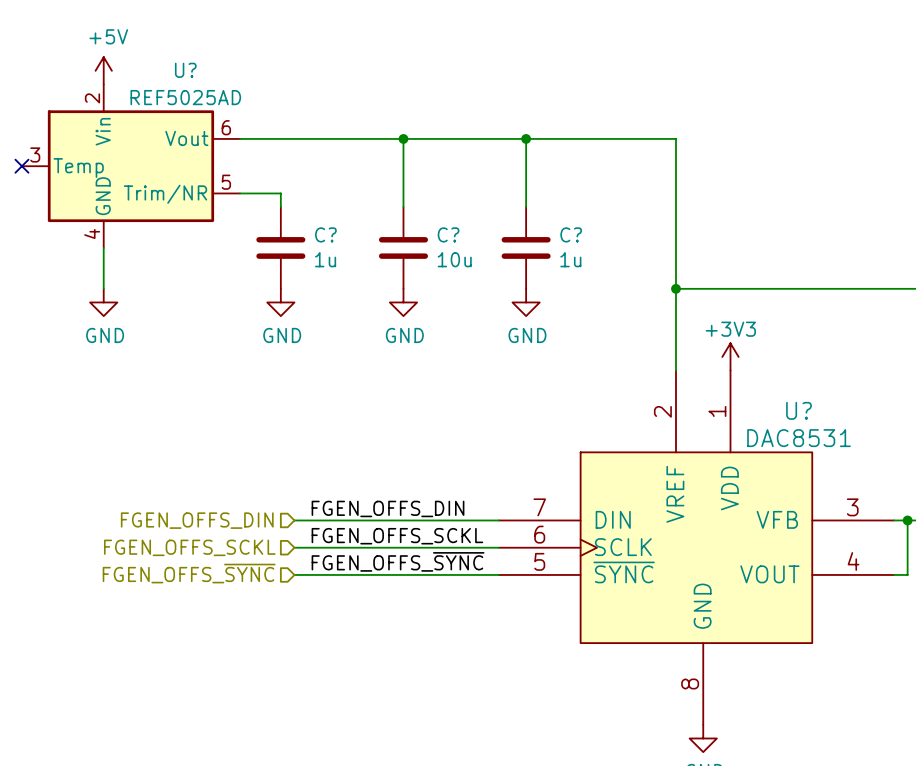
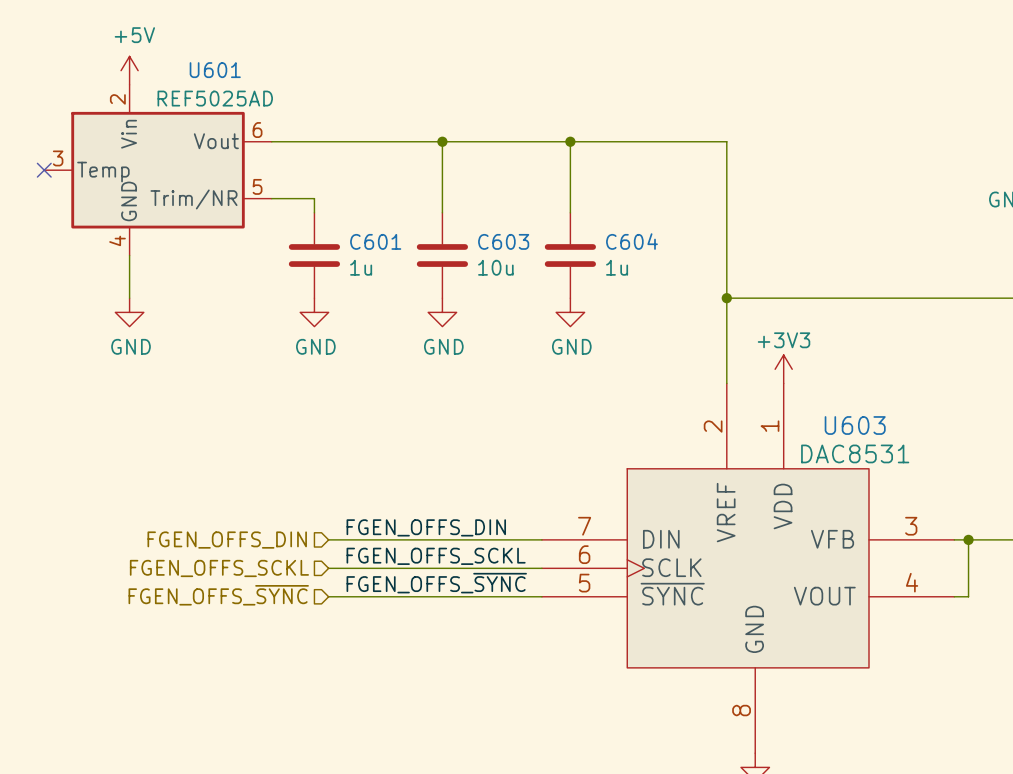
U? name: U? (185, 70) -> U601 (215, 70)
C? name: C? (325, 234) -> C601 (375, 241)
C? name: C? (448, 234) -> C603 (503, 241)
C? name: C? (571, 234) -> C604 (631, 241)
U? name: U? (799, 410) -> U603 (855, 425)

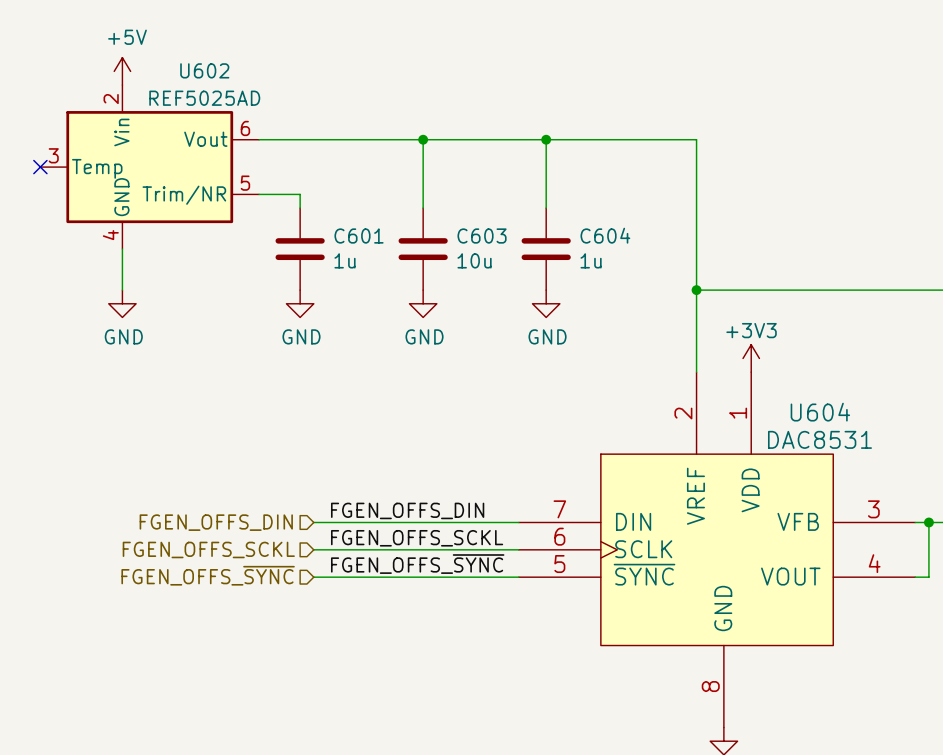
U601 name: U601 (215, 70) -> U602 (204, 70)
U603 name: U603 (855, 425) -> U604 (820, 412)

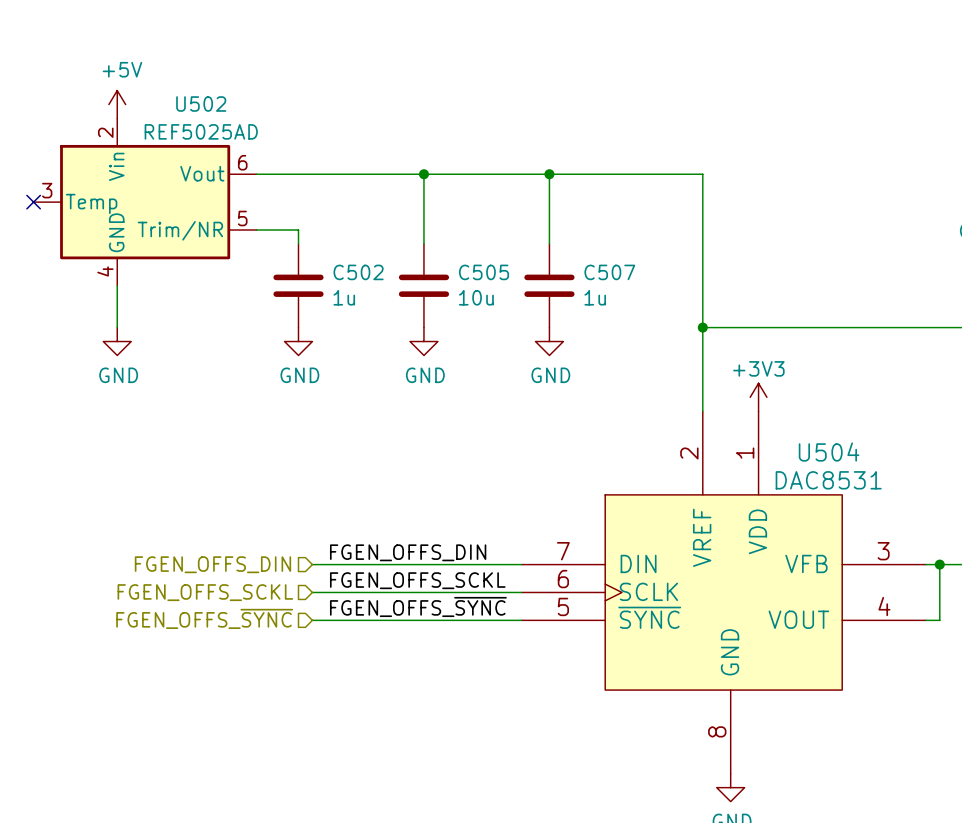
U602 name: U602 (204, 70) -> U502 (201, 104)
C604 name: C604 (605, 235) -> C507 (609, 272)
C601 name: C601 (359, 236) -> C502 (358, 272)
C603 name: C603 (482, 236) -> C505 (484, 272)
U604 name: U604 (820, 412) -> U504 (829, 452)

